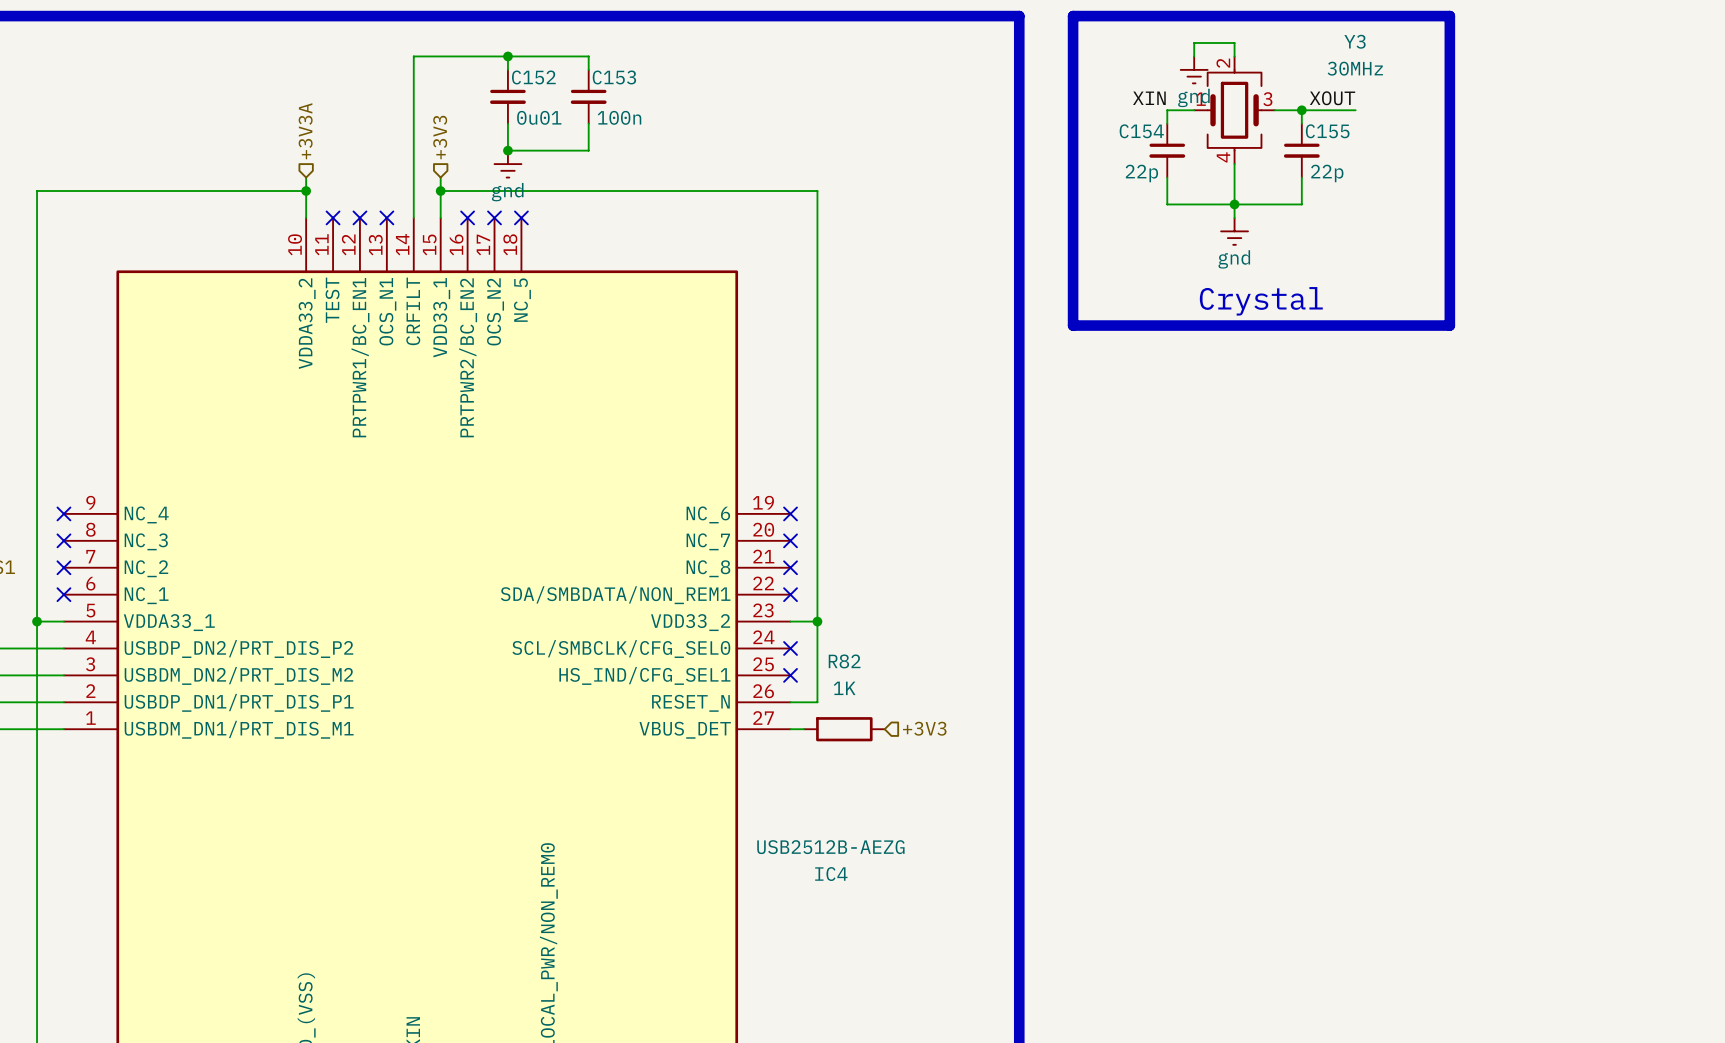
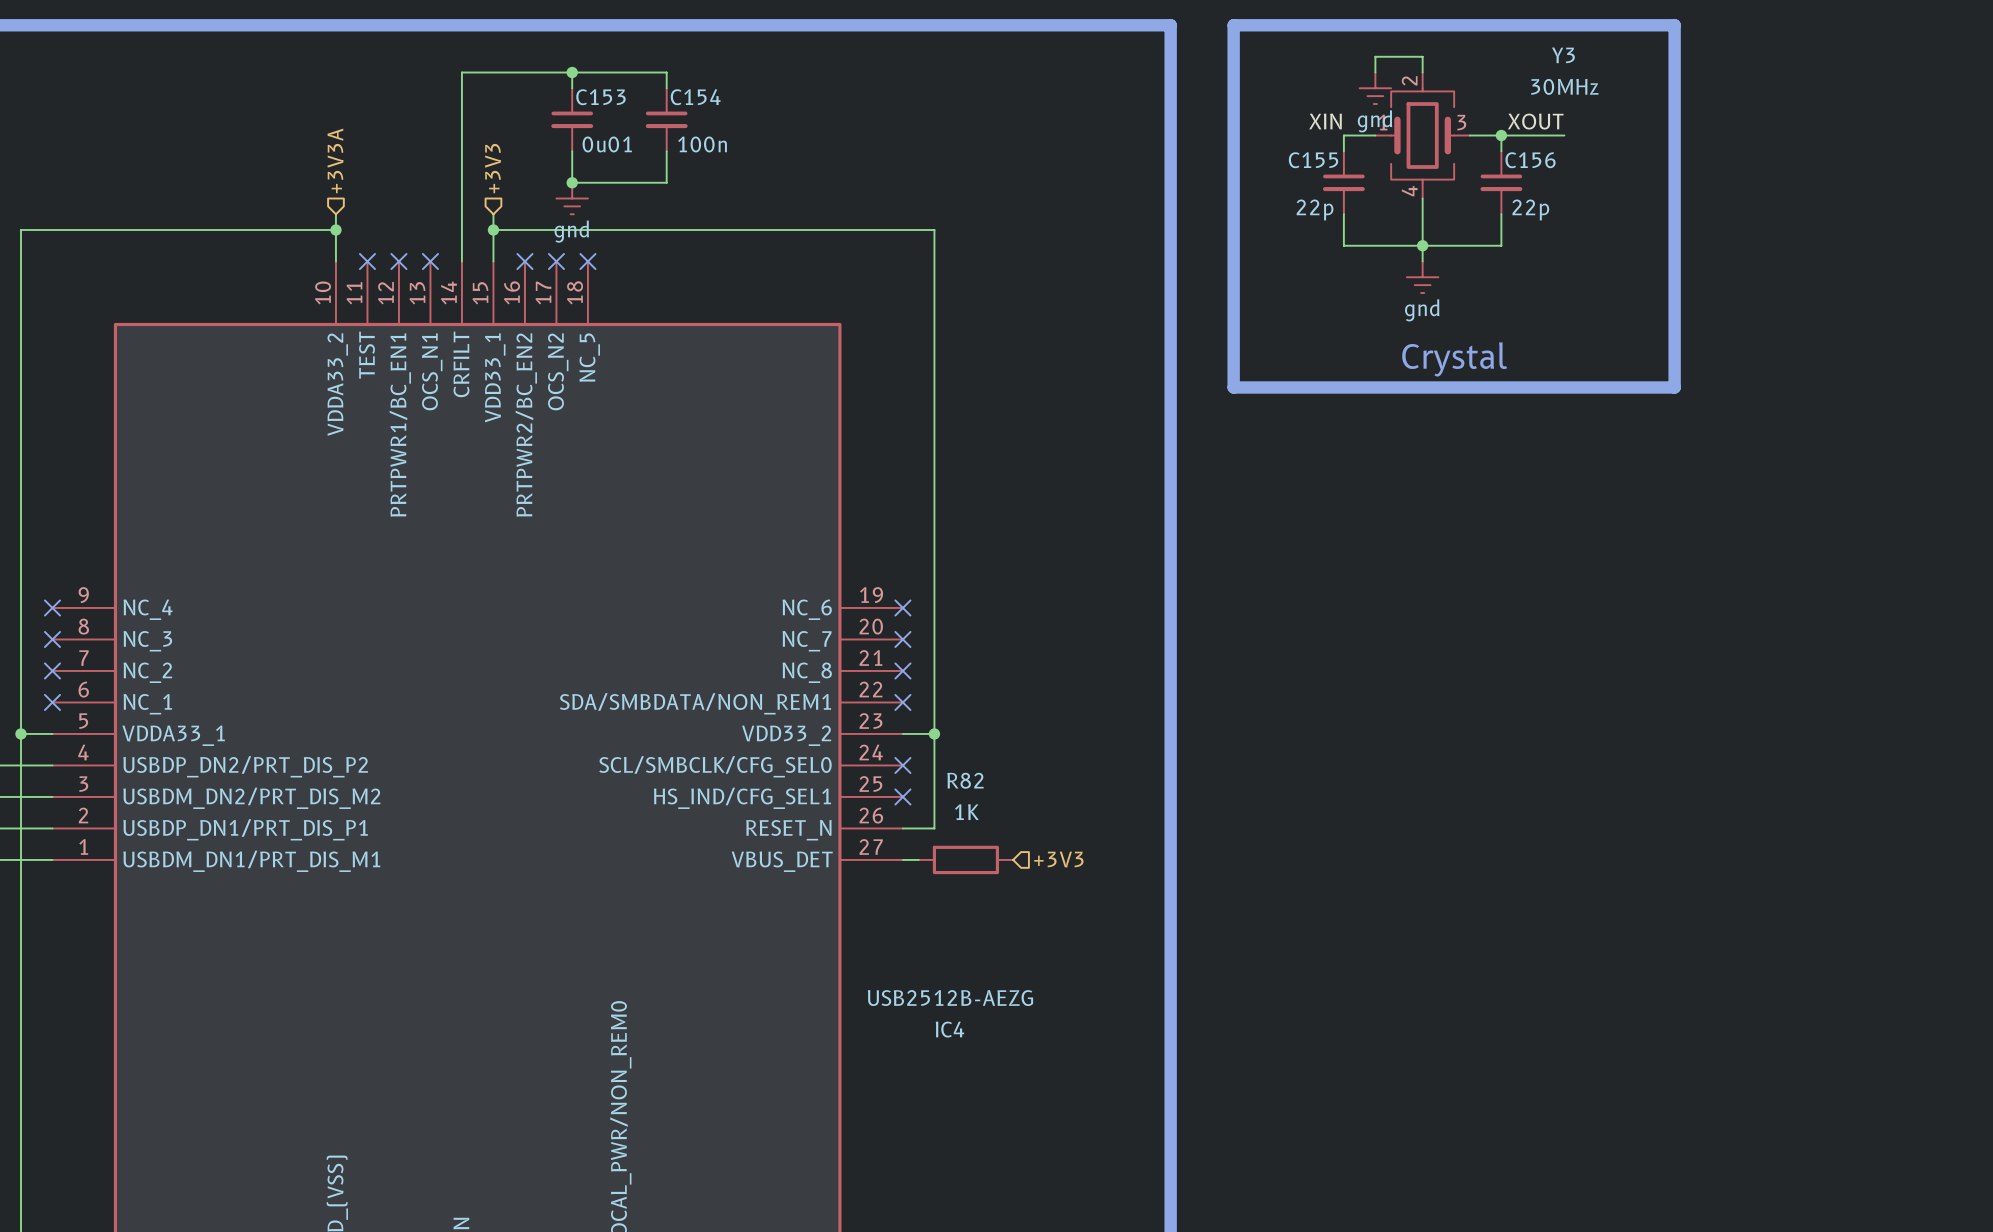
C152 name: C152 (533, 77) -> C153 (600, 97)
C153 name: C153 (614, 77) -> C154 (695, 97)
C154 name: C154 (1141, 131) -> C155 (1313, 160)
C155 name: C155 (1327, 131) -> C156 (1530, 160)

